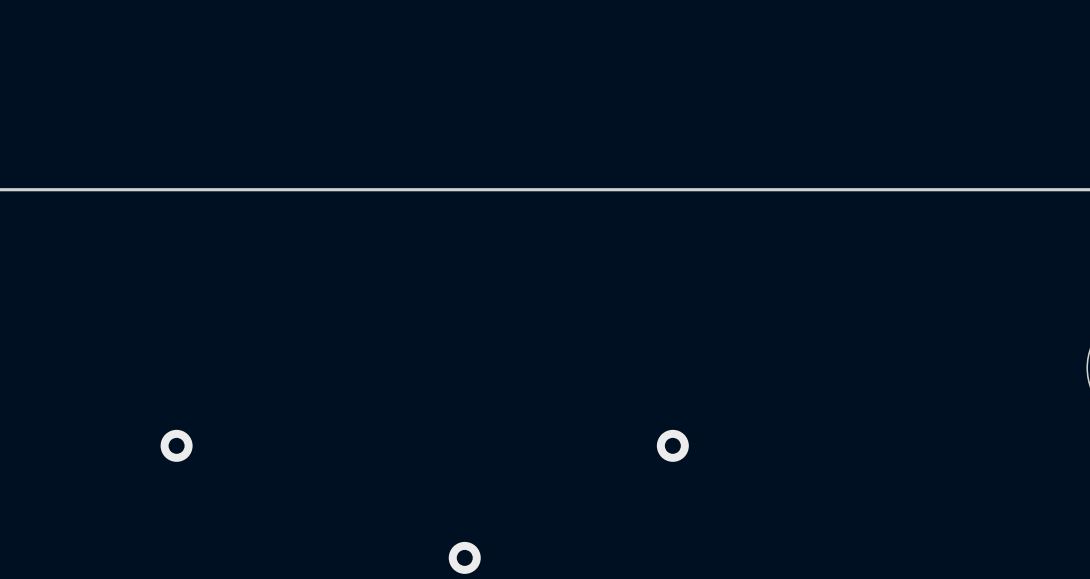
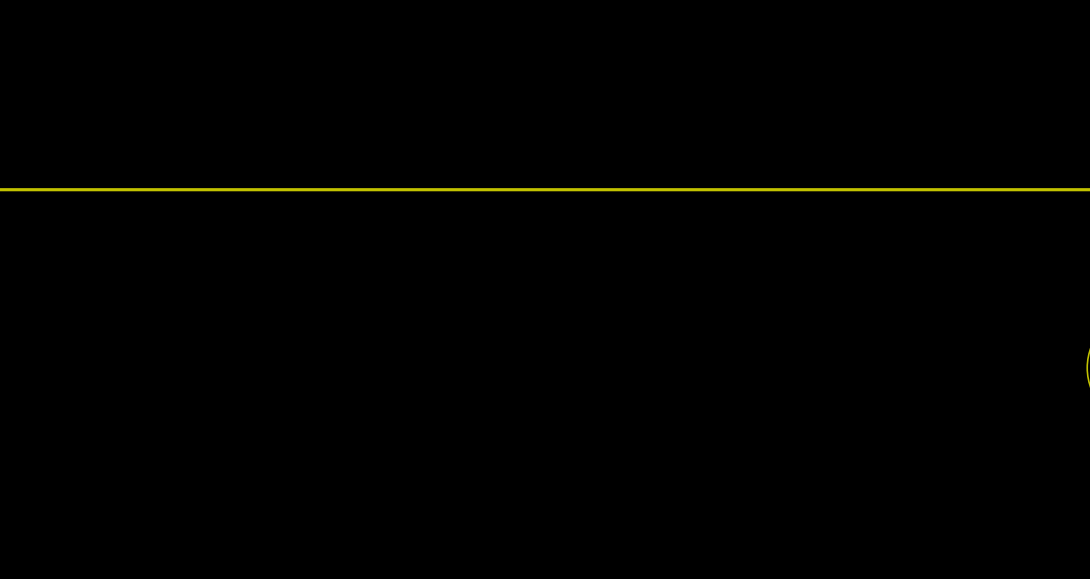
via: (176, 445) -> none
via: (672, 445) -> none
via: (464, 557) -> none

